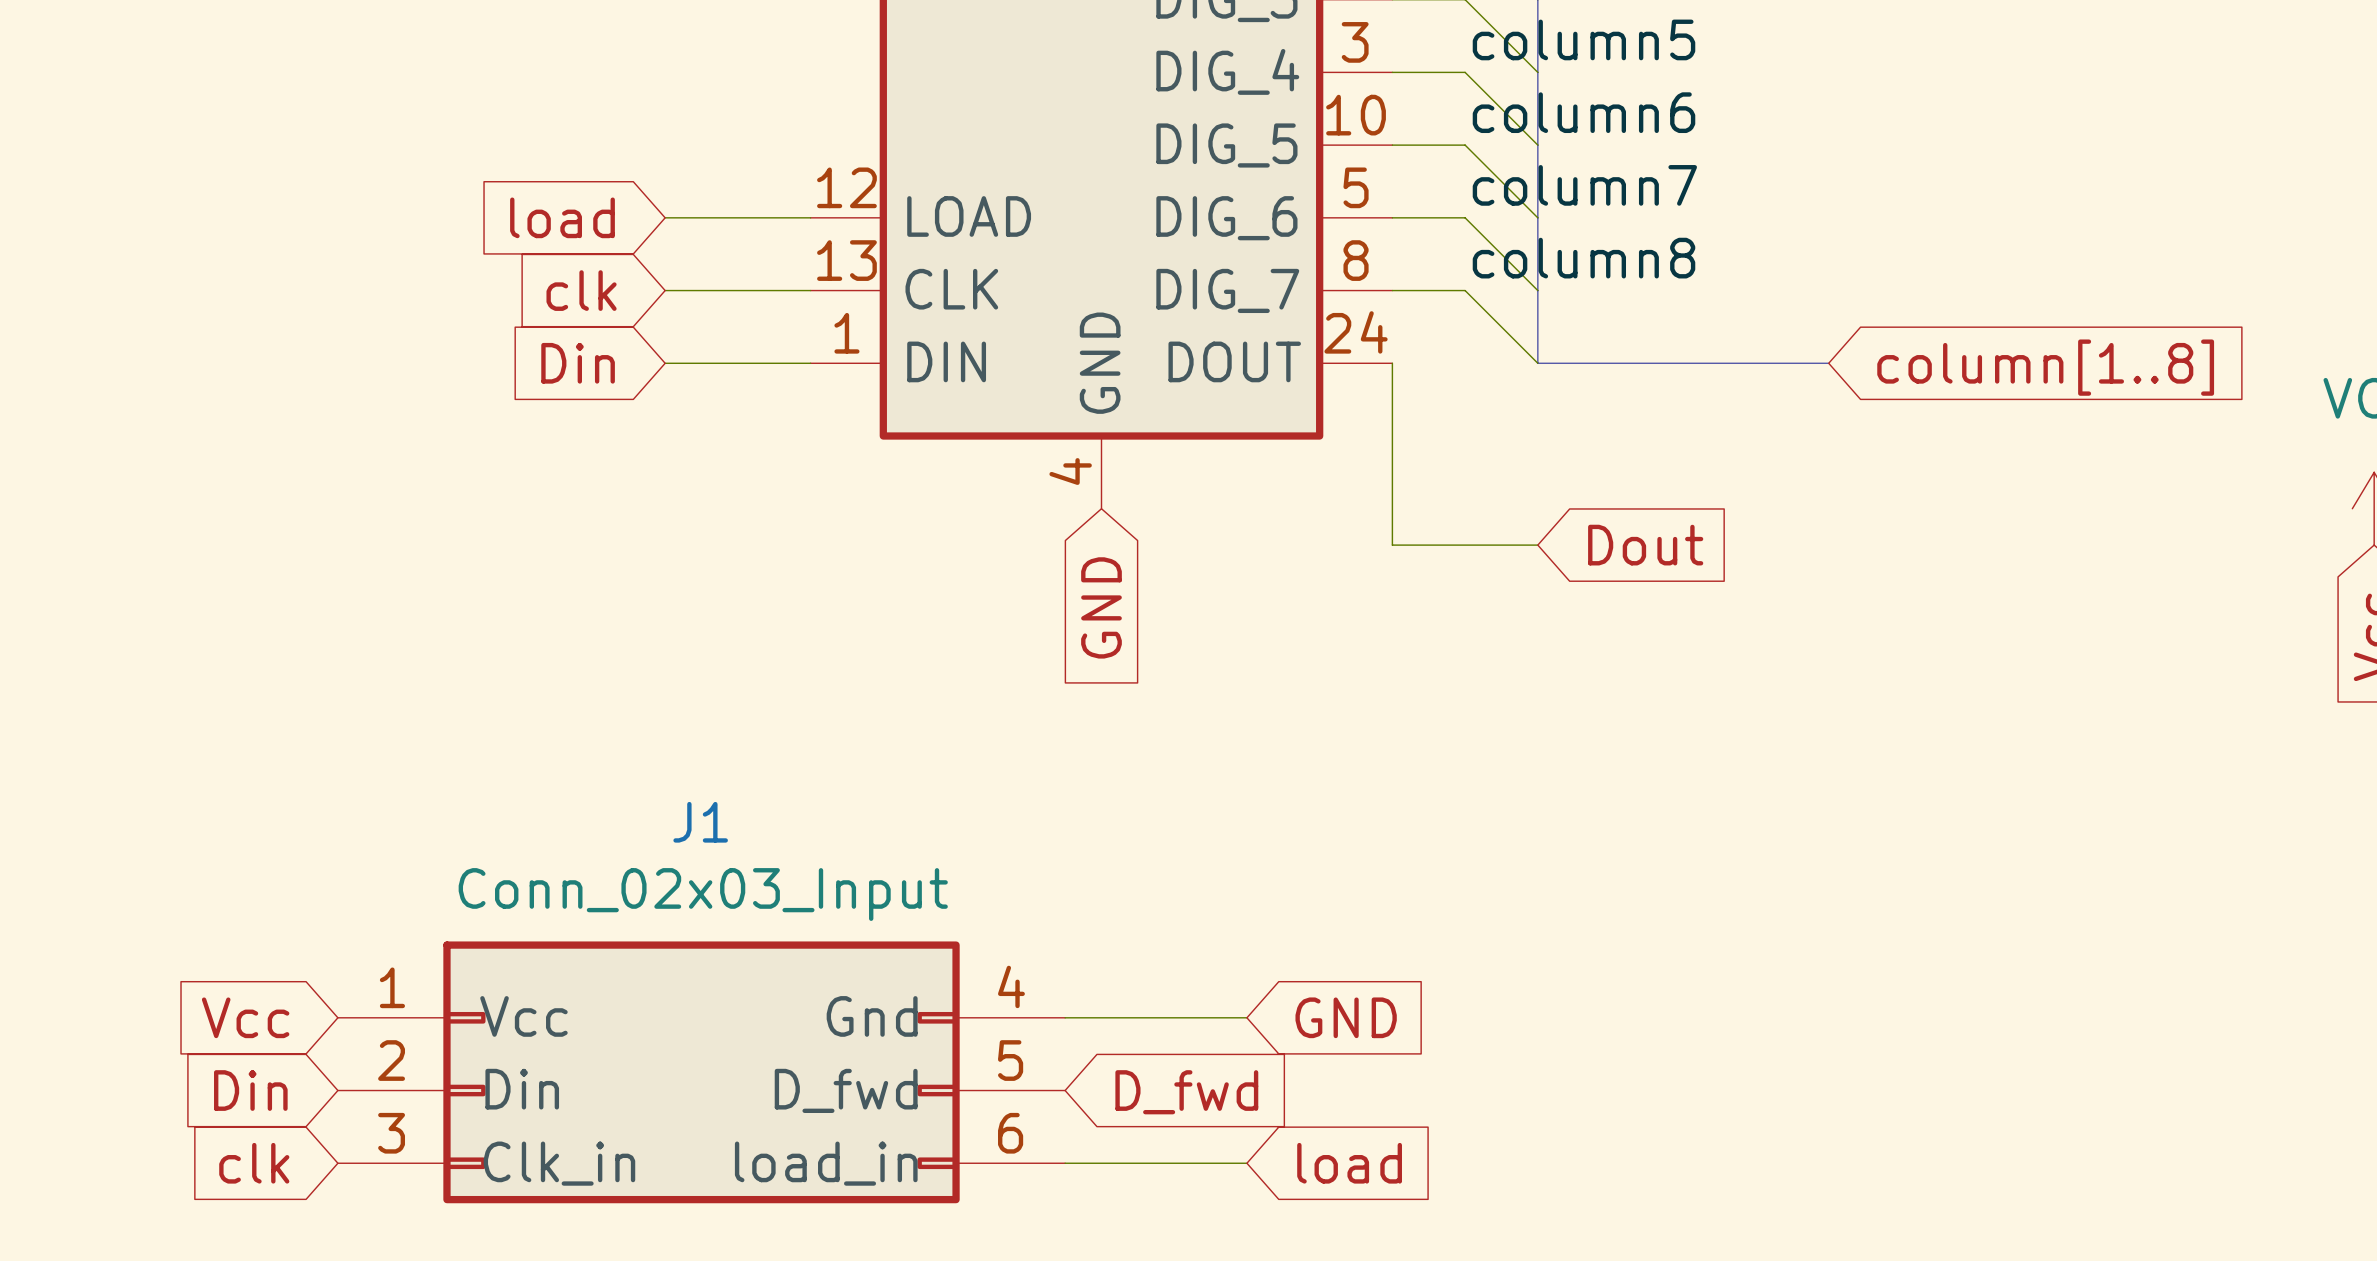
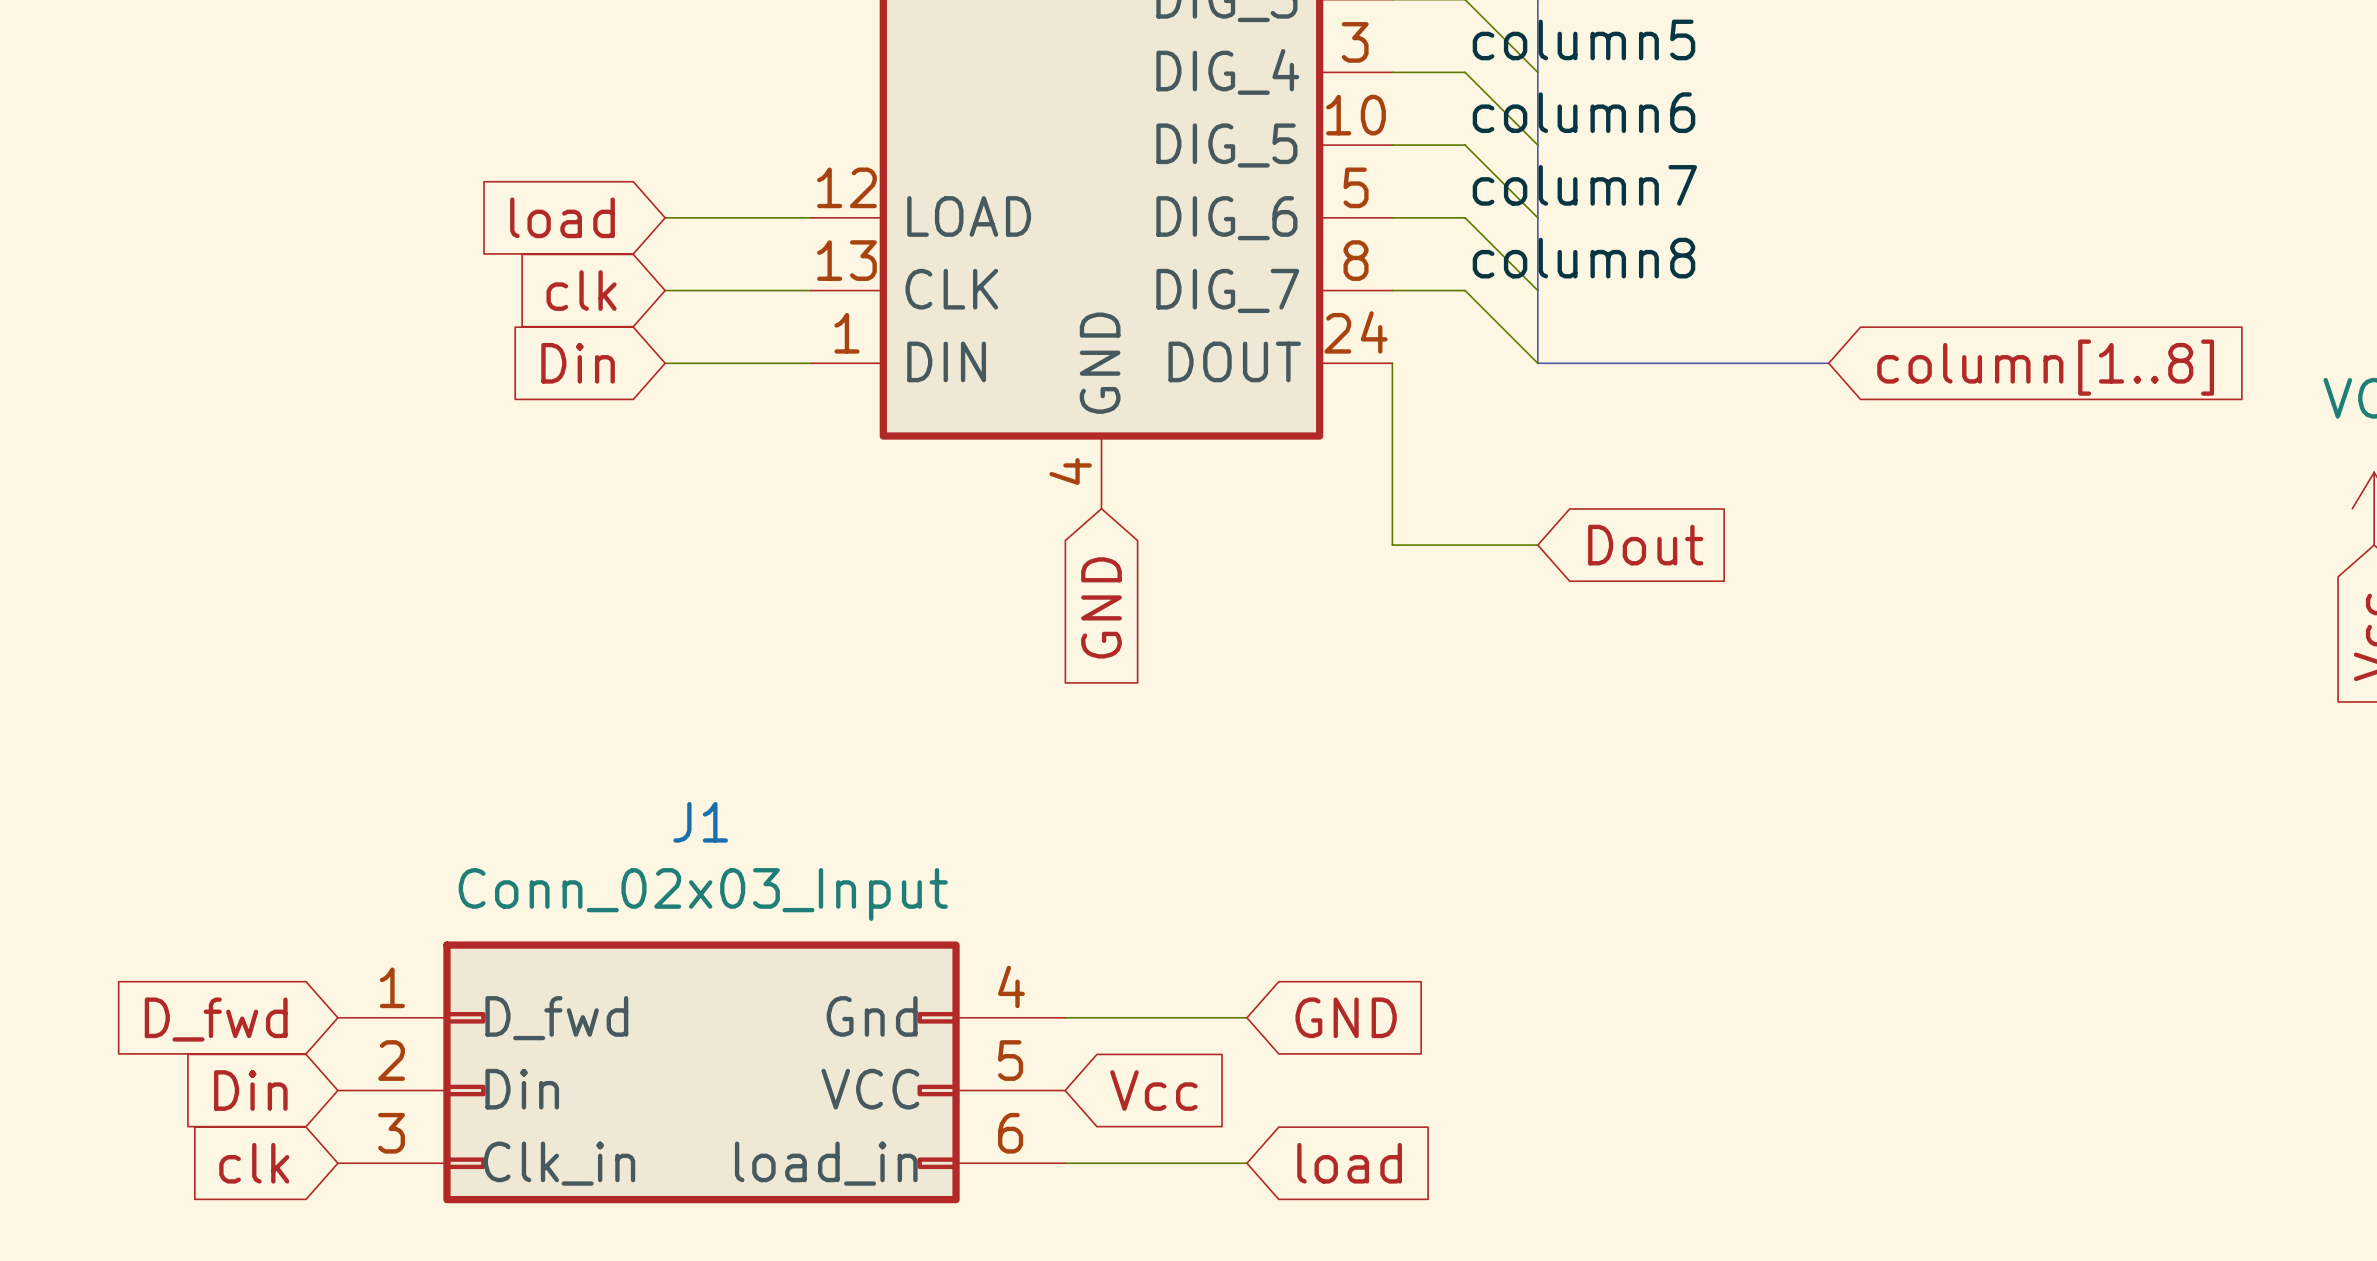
J1 pin name: Vcc (523, 1016) -> D_fwd (556, 1018)
global label: Vcc (245, 1017) -> D_fwd (216, 1019)
J1 pin name: D_fwd (846, 1090) -> VCC (870, 1089)
global label: D_fwd (1186, 1092) -> Vcc (1153, 1090)

